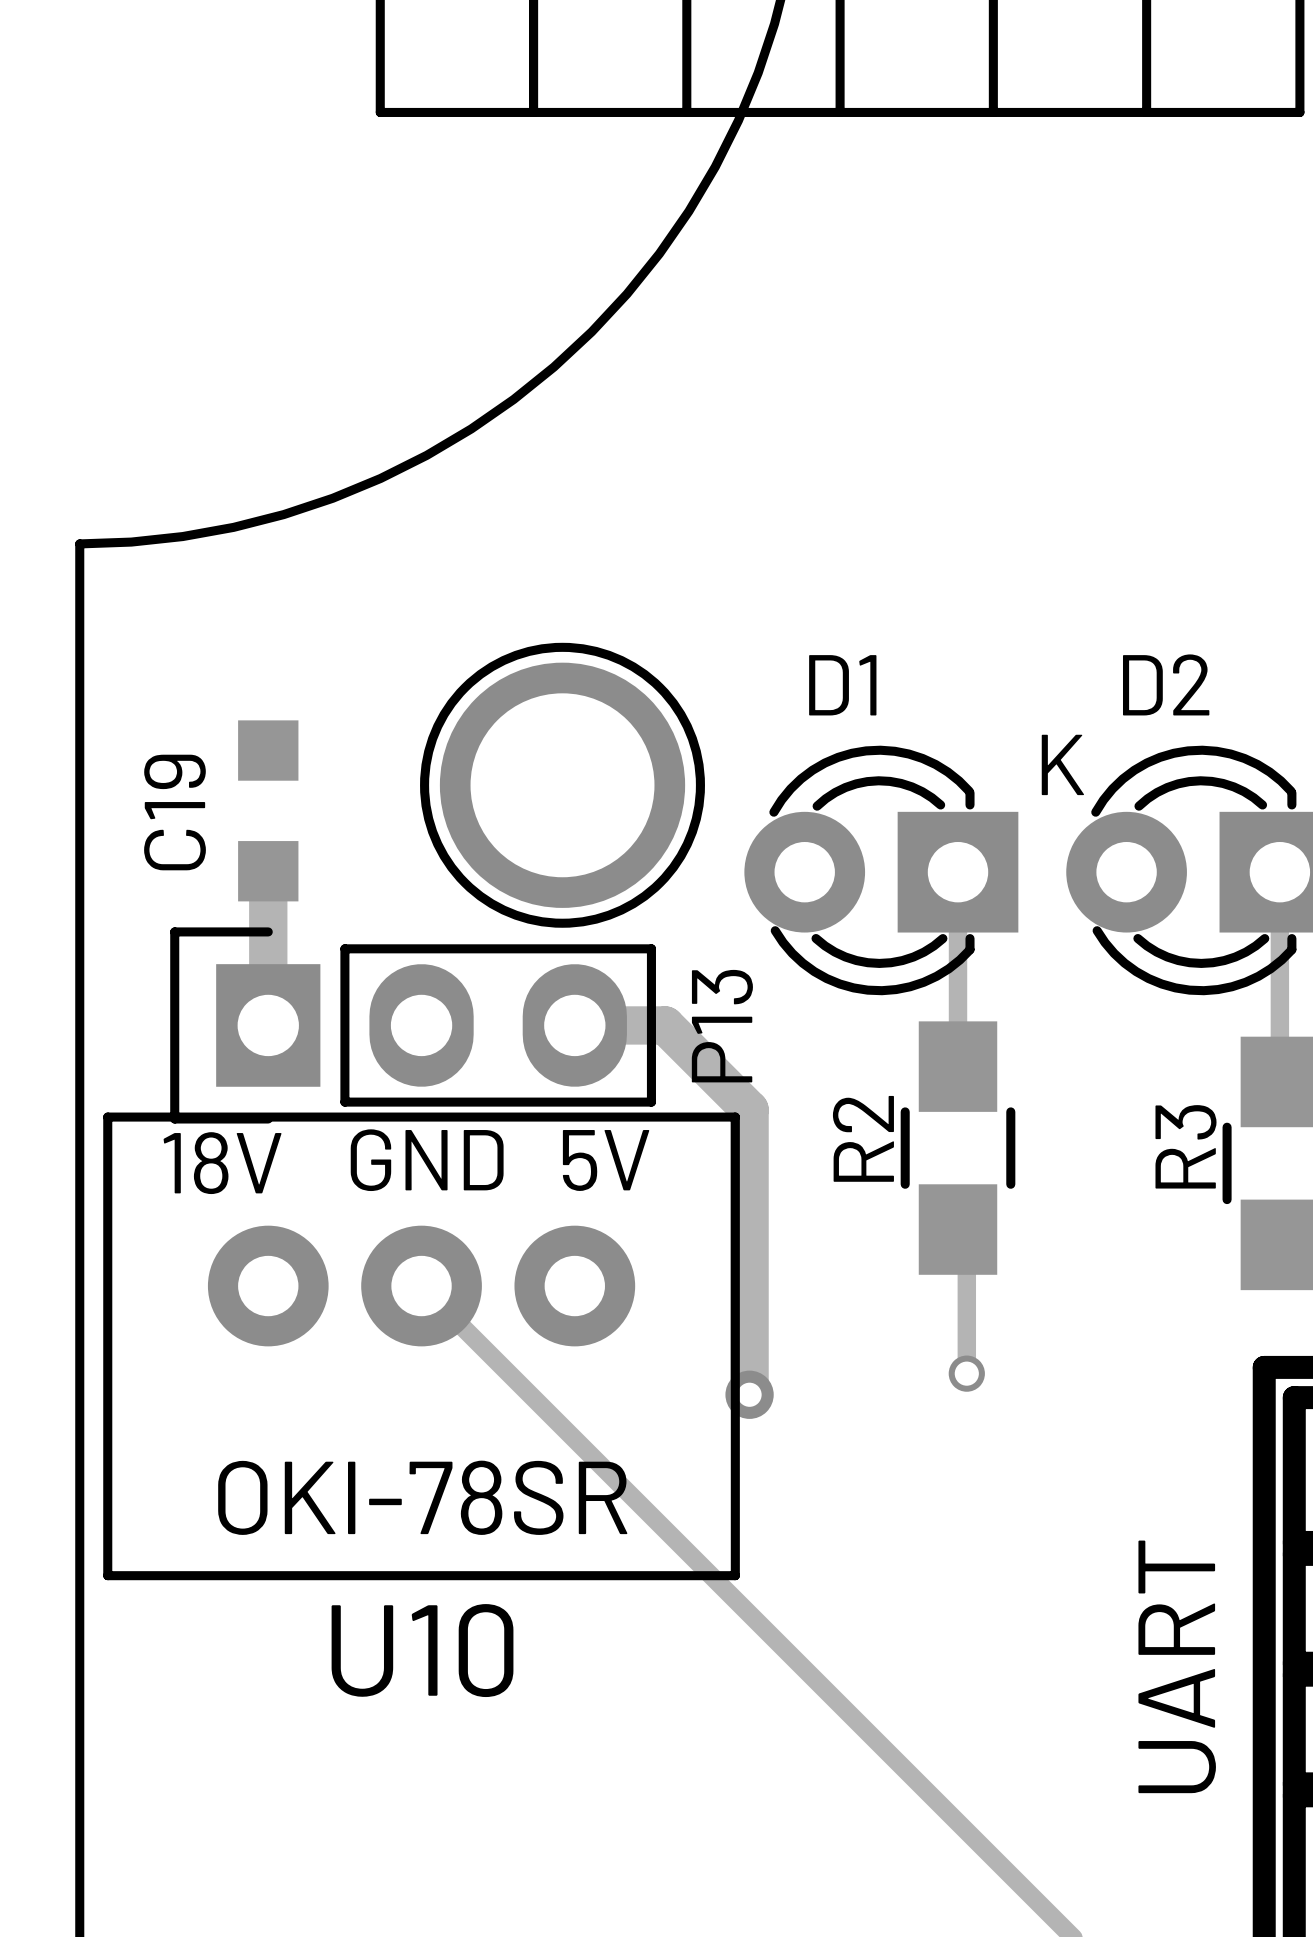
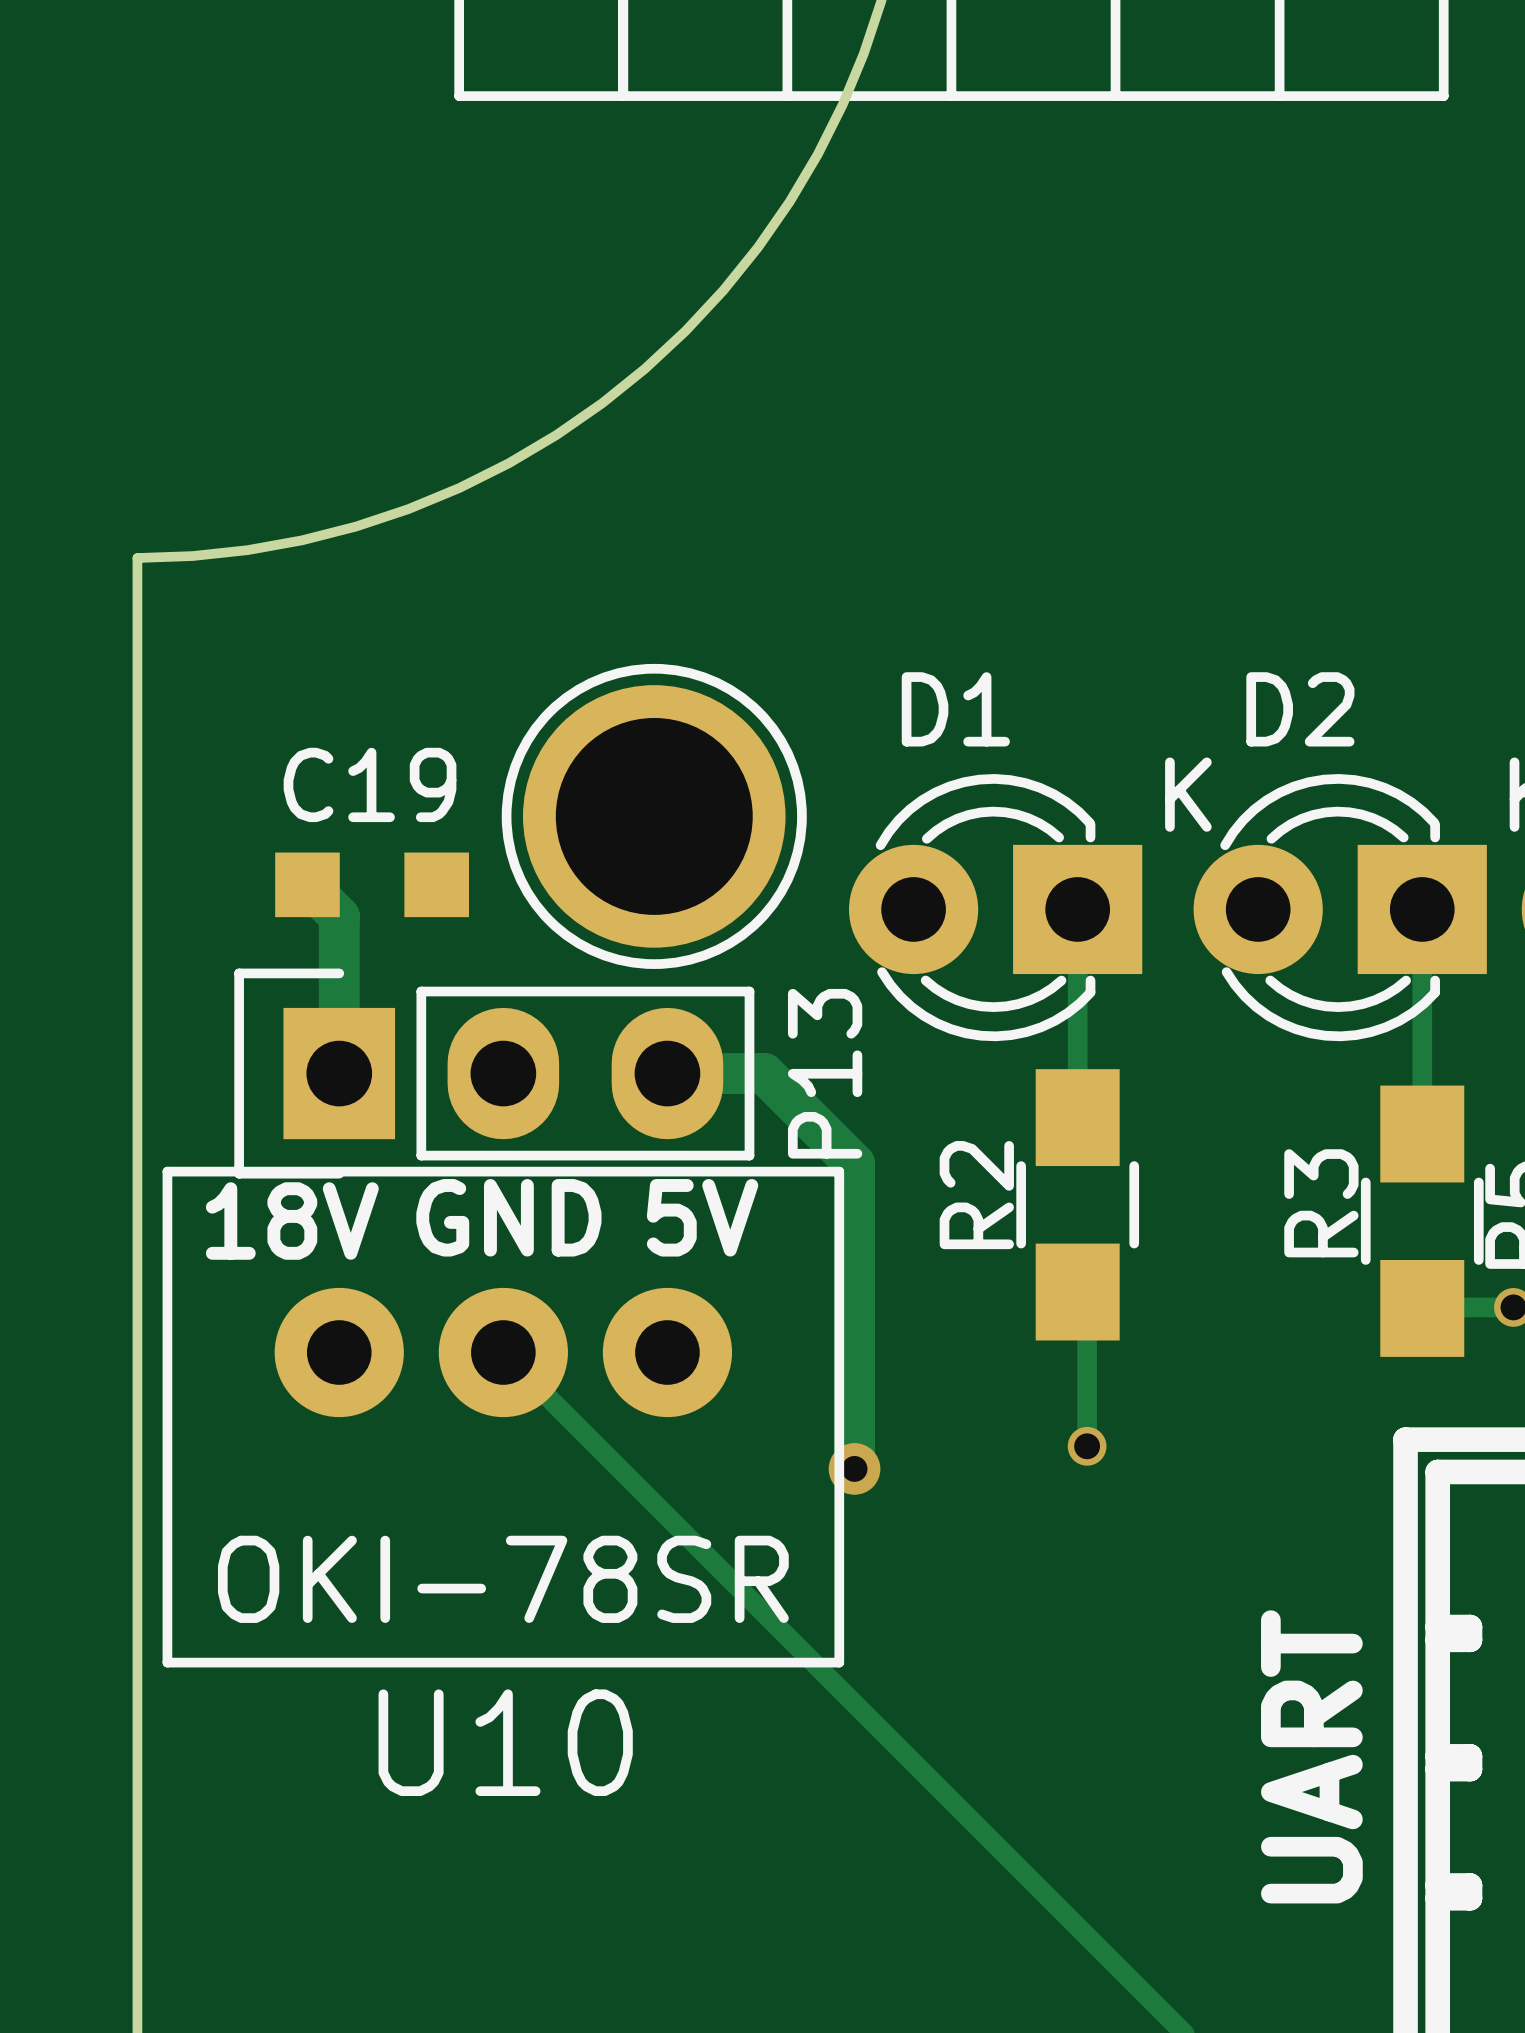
C19 rotation: 0° (268, 810) -> 90° clockwise (372, 884)

